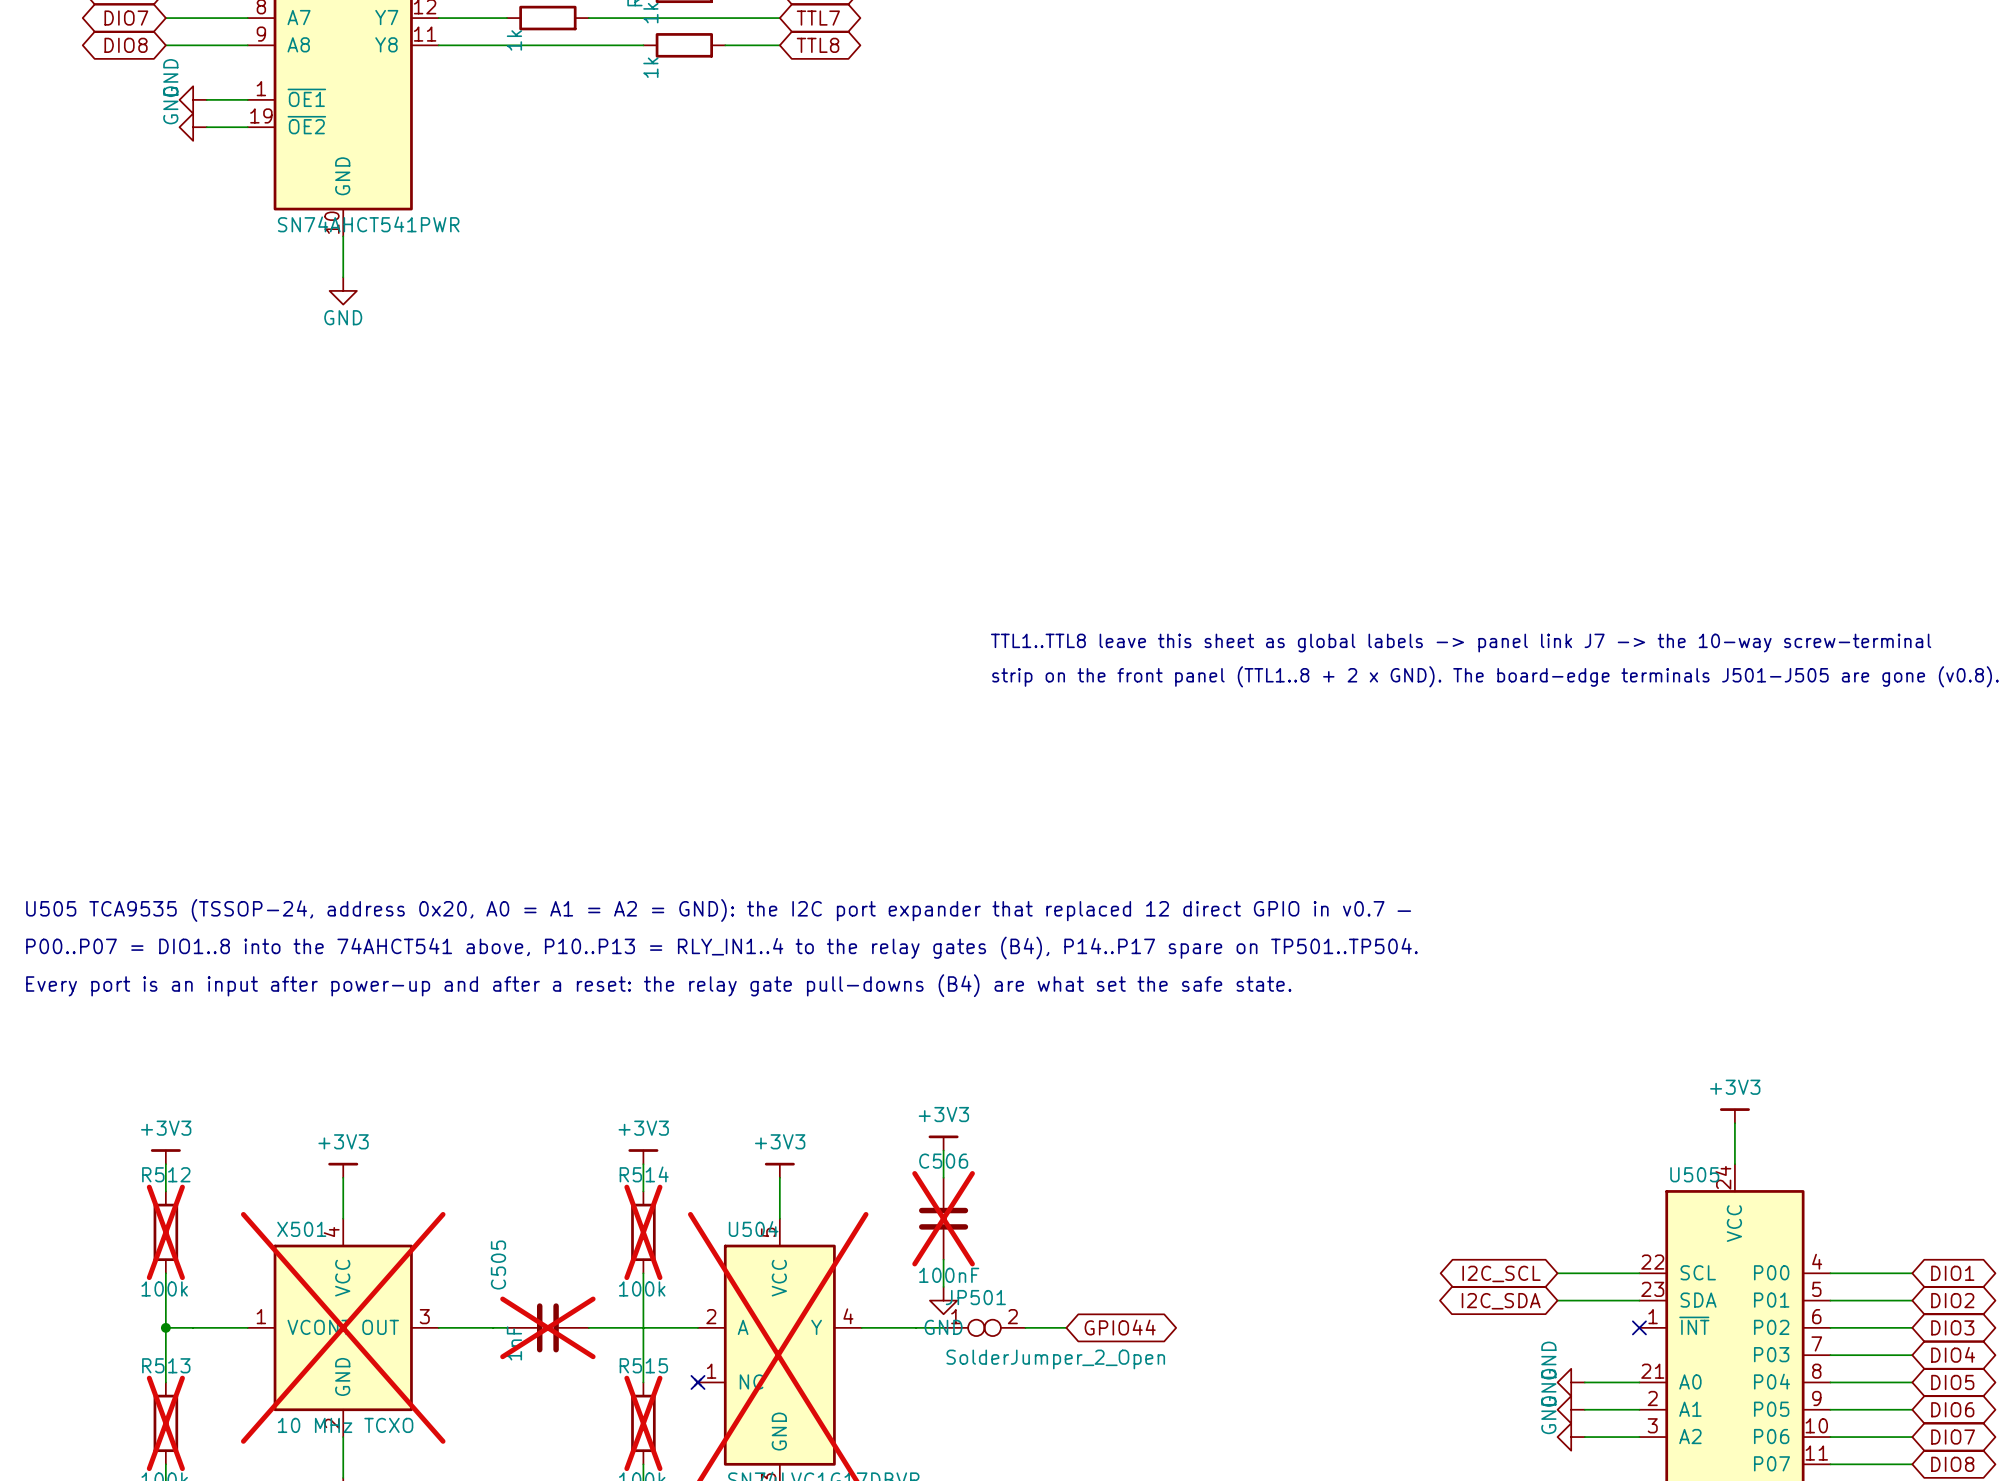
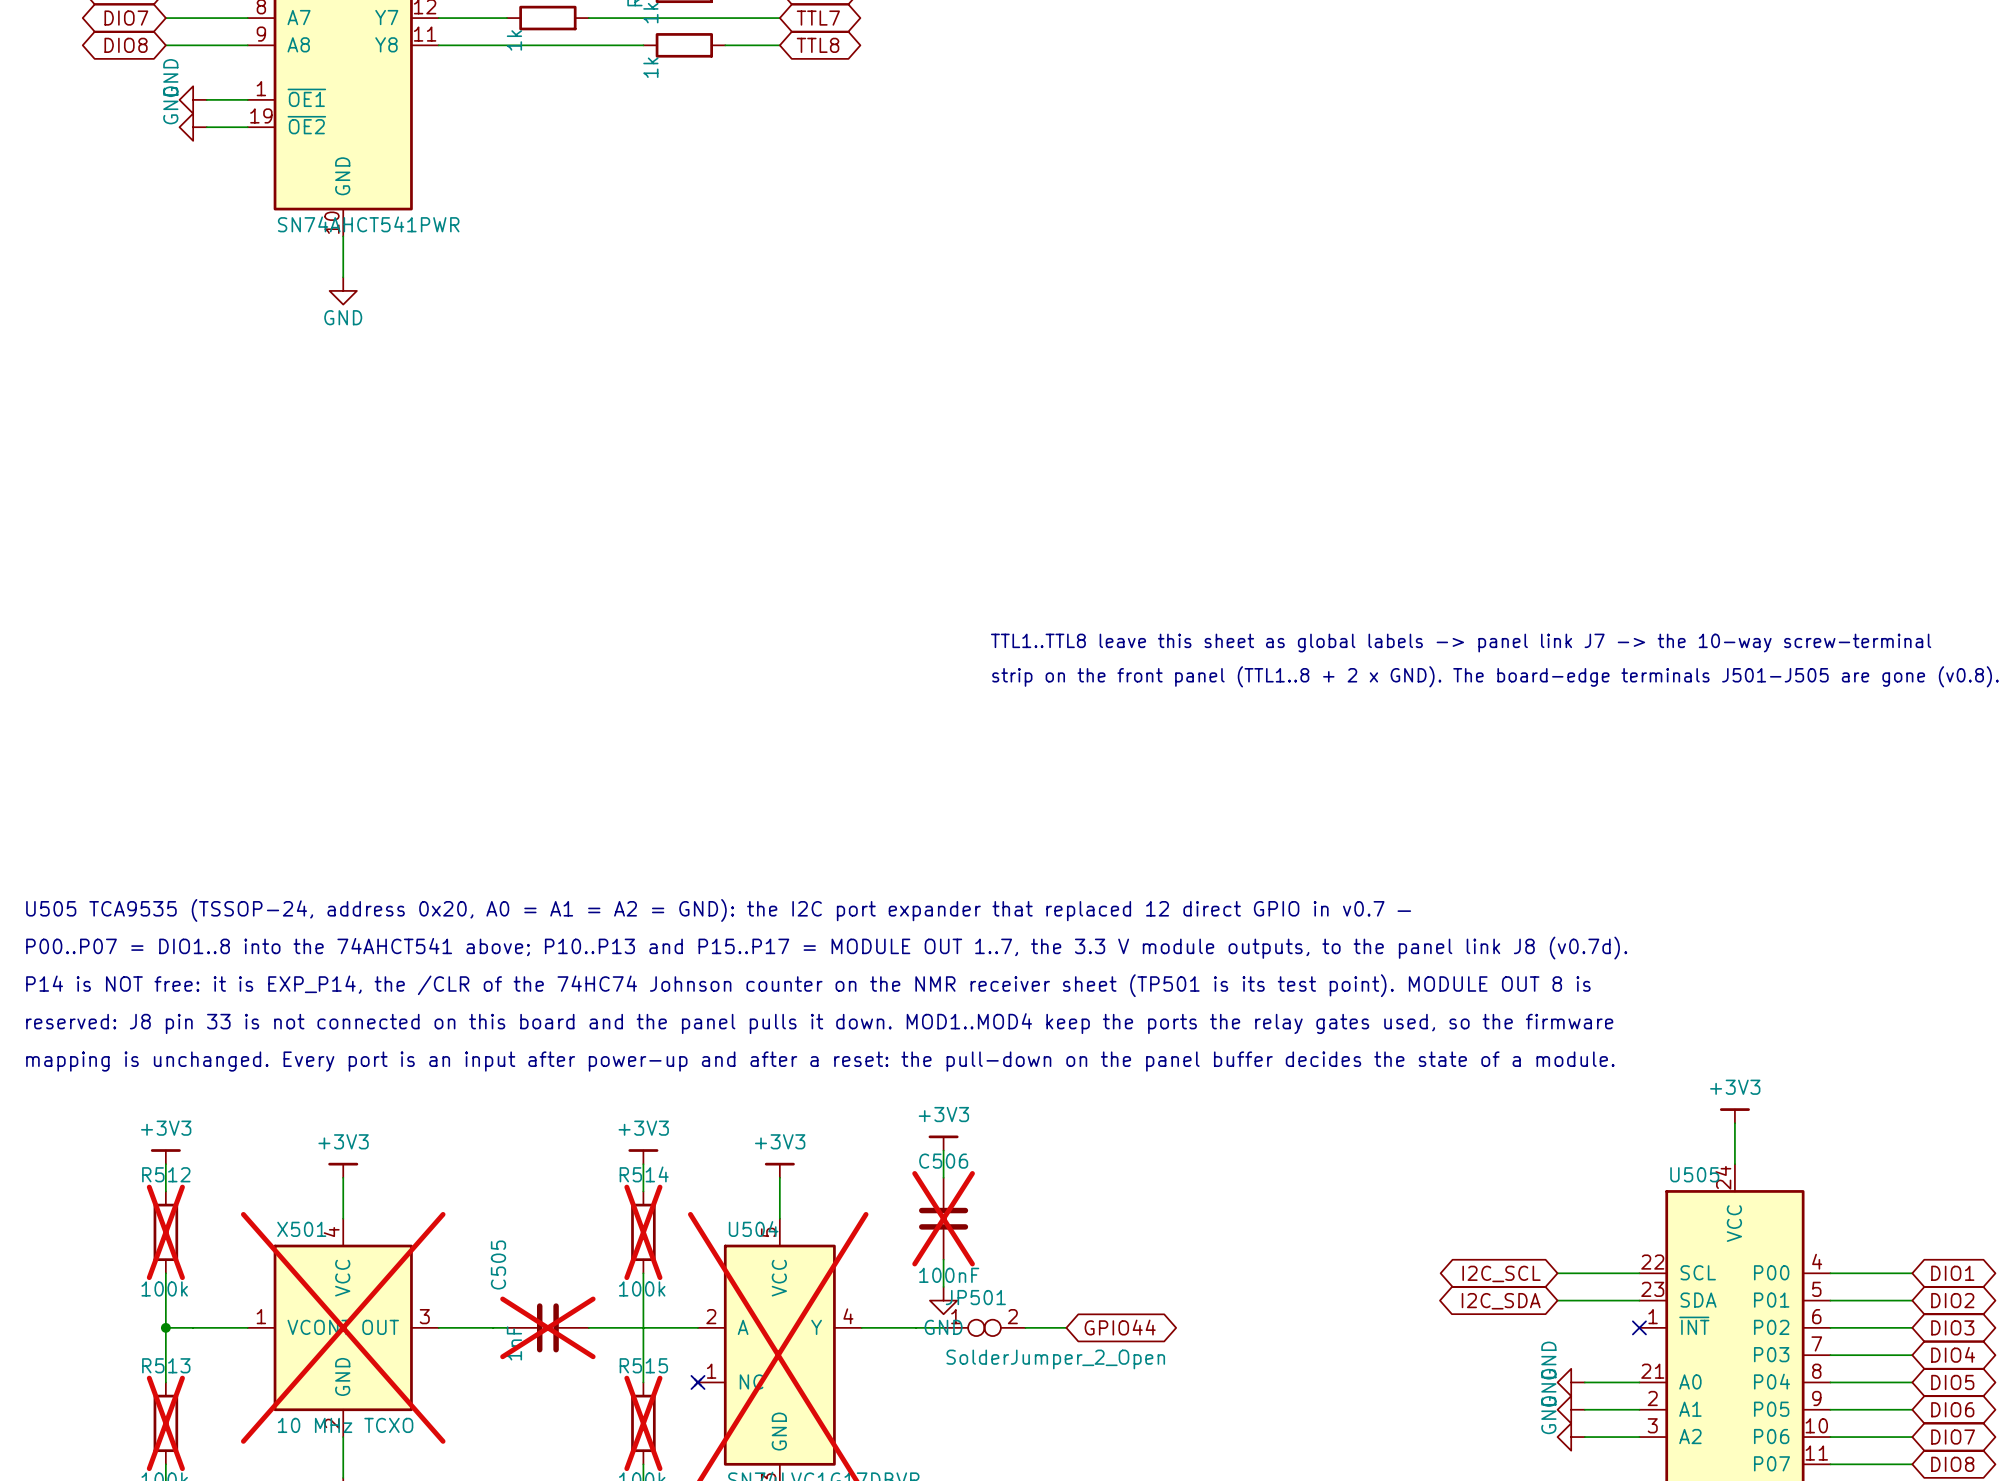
text: P00..P07 = DIO1..8 into the 74AHCT541 above, P10..P13 = RLY_IN1..4 to the relay gates (B4), P14..P17 spare on TP501..TP504. (721, 948) -> P00..P07 = DIO1..8 into the 74AHCT541 above; P10..P13 and P15..P17 = MODULE OUT 1..7, the 3.3 V module outputs, to the panel link J8 (v0.7d). (826, 948)
text: Every port is an input after power-up and after a reset: the relay gate pull-downs (B4) are what set the safe state. (658, 985) -> P14 is NOT free: it is EXP_P14, the /CLR of the 74HC74 Johnson counter on the NMR receiver sheet (TP501 is its test point). MODULE OUT 8 is (808, 985)
text: none -> reserved: J8 pin 33 is not connected on this board and the panel pulls it down. MOD1..MOD4 keep the ports the relay gates used, so the firmware (819, 1023)
text: none -> mapping is unchanged. Every port is an input after power-up and after a reset: the pull-down on the panel buffer decides the state of a module. (820, 1061)

